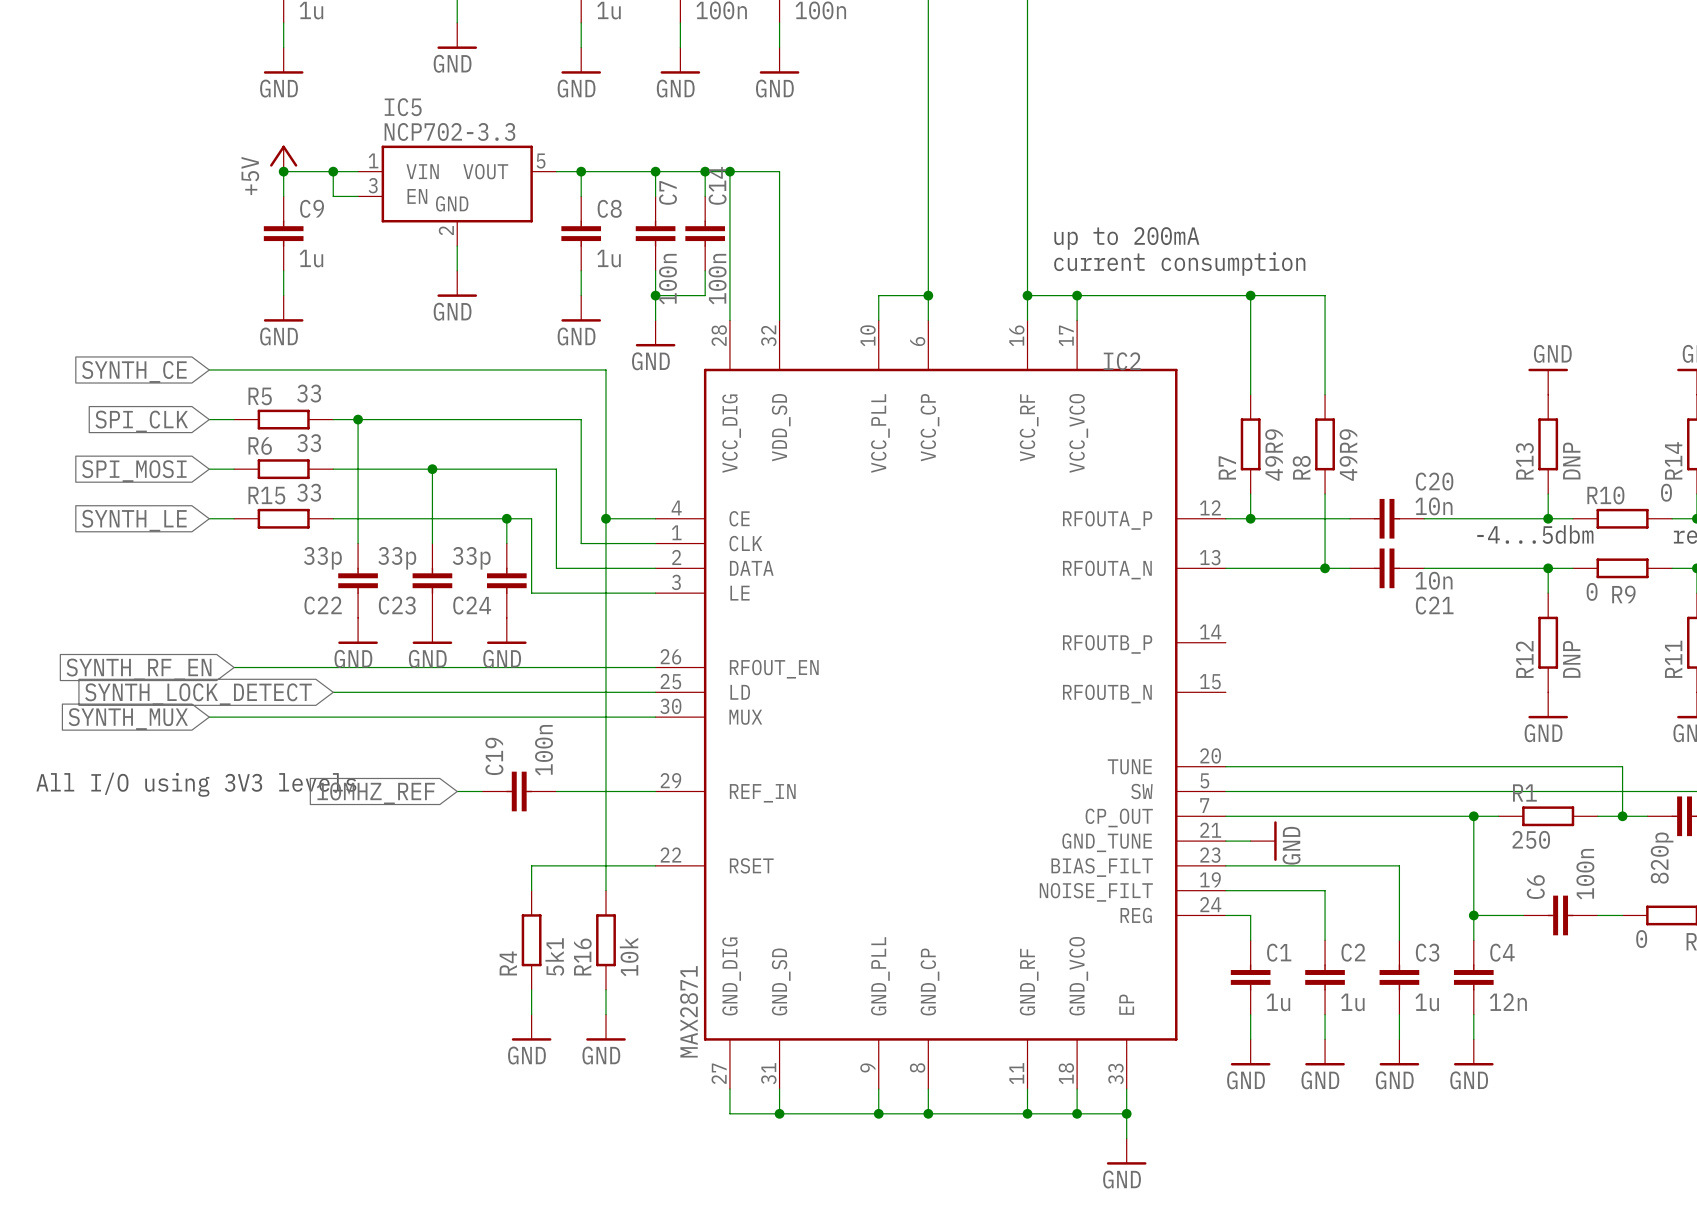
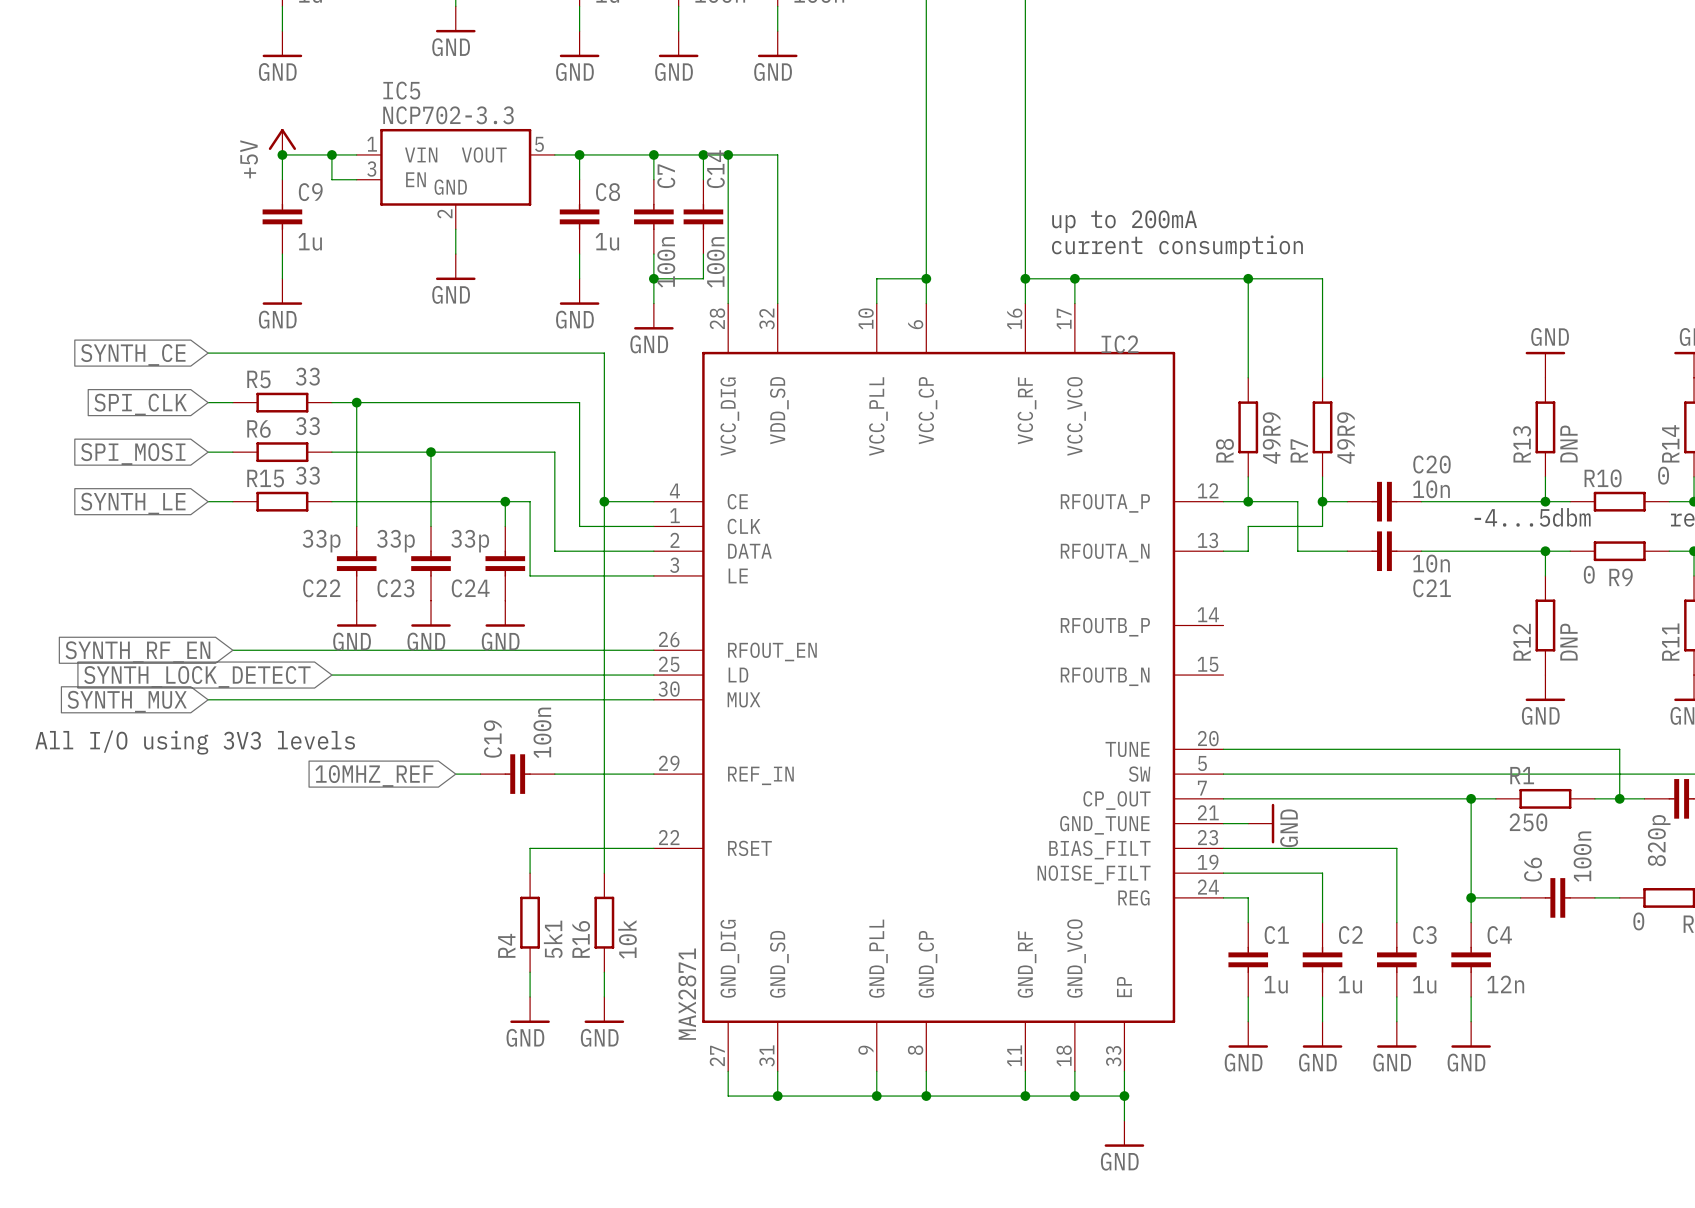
R7 name: R7 (1227, 467) -> R8 (1224, 450)
R8 name: R8 (1301, 467) -> R7 (1299, 450)
wire: (1300, 518) (1325, 518) -> (1297, 501) (1297, 551)
wire: (1325, 543) (1325, 568) -> none
wire: (1250, 568) (1300, 568) -> (1248, 551) (1248, 526) (1322, 526)
junction position: (1325, 568) -> (1322, 501)
text position: All I/O using 3V3 levels (196, 784) -> All I/O using 3V3 levels (195, 742)

